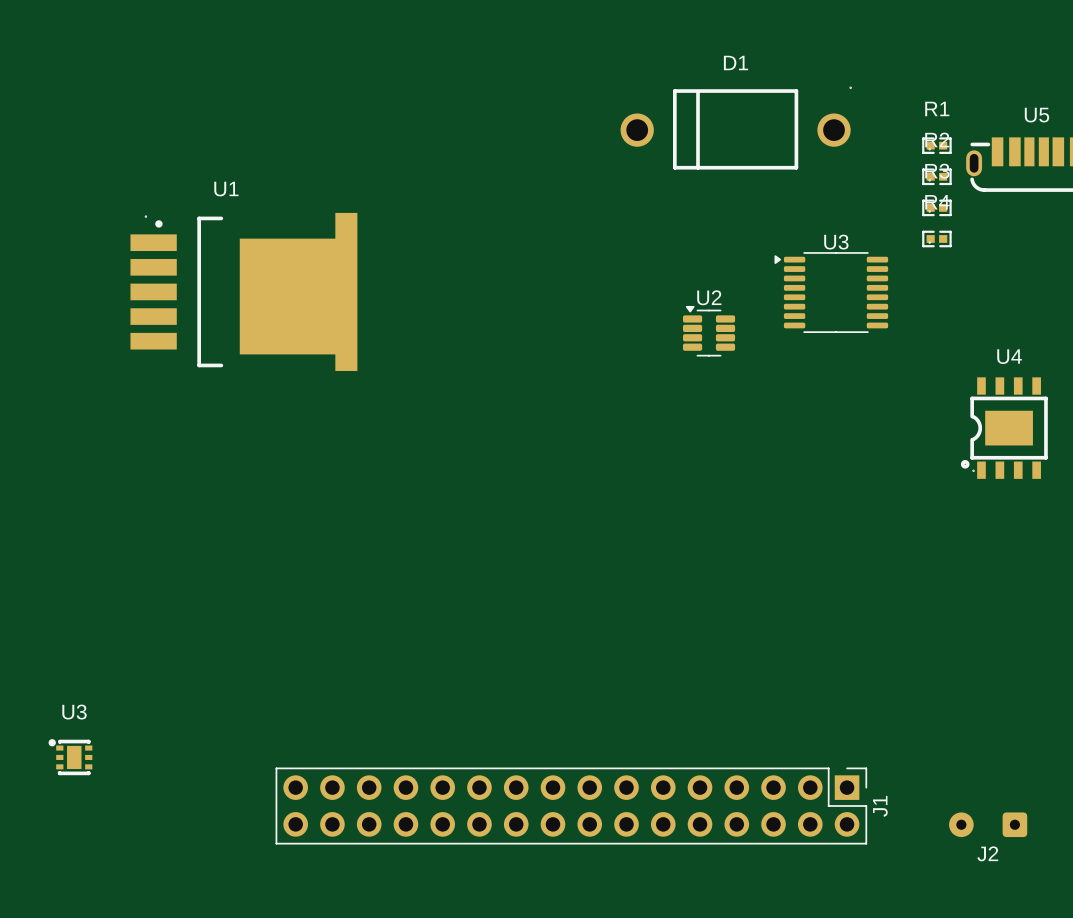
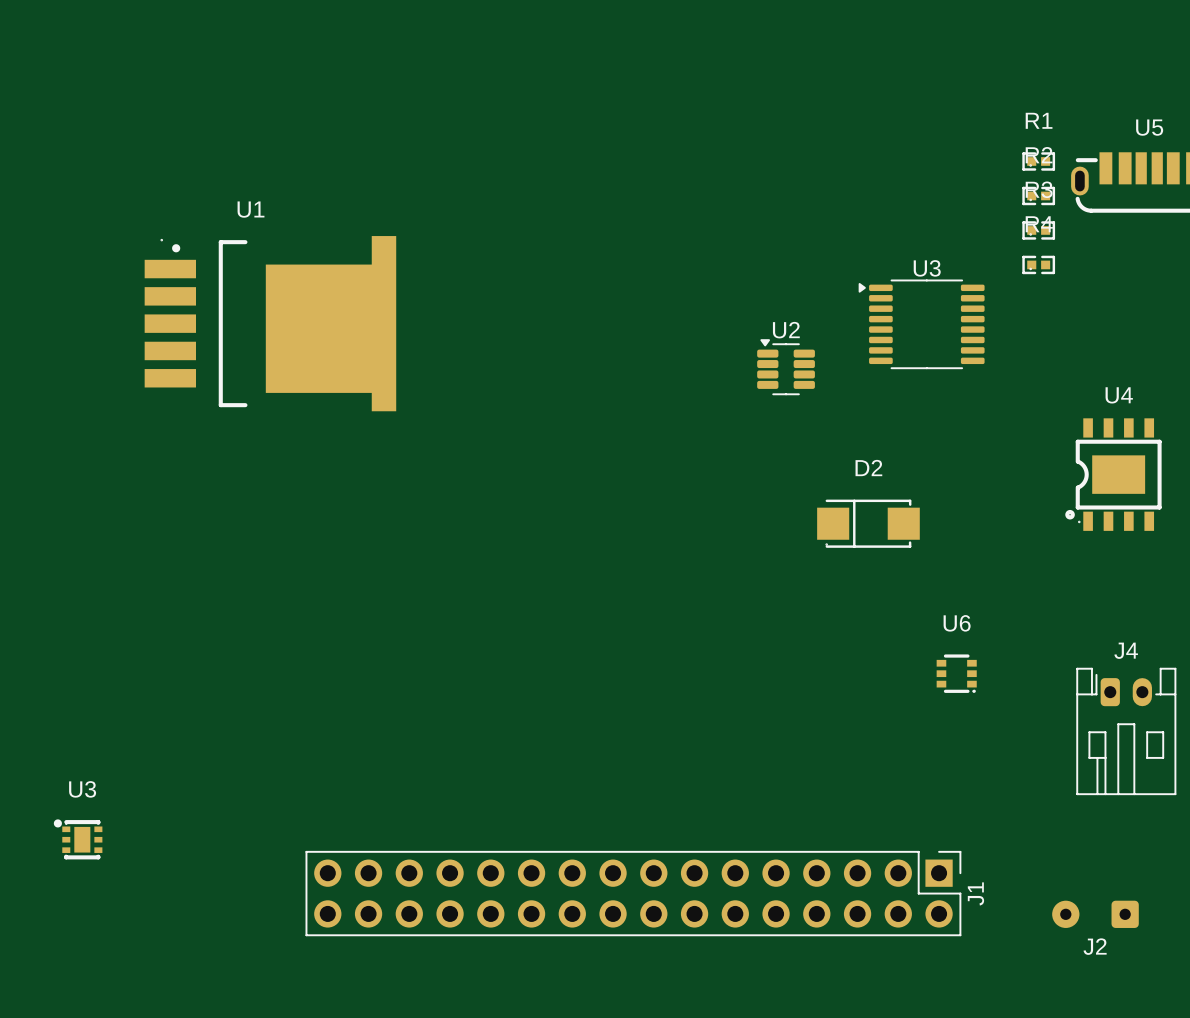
D1: (736, 128) -> none
D2: none -> (868, 523)
U6: none -> (956, 673)
J4: none -> (1126, 731)

